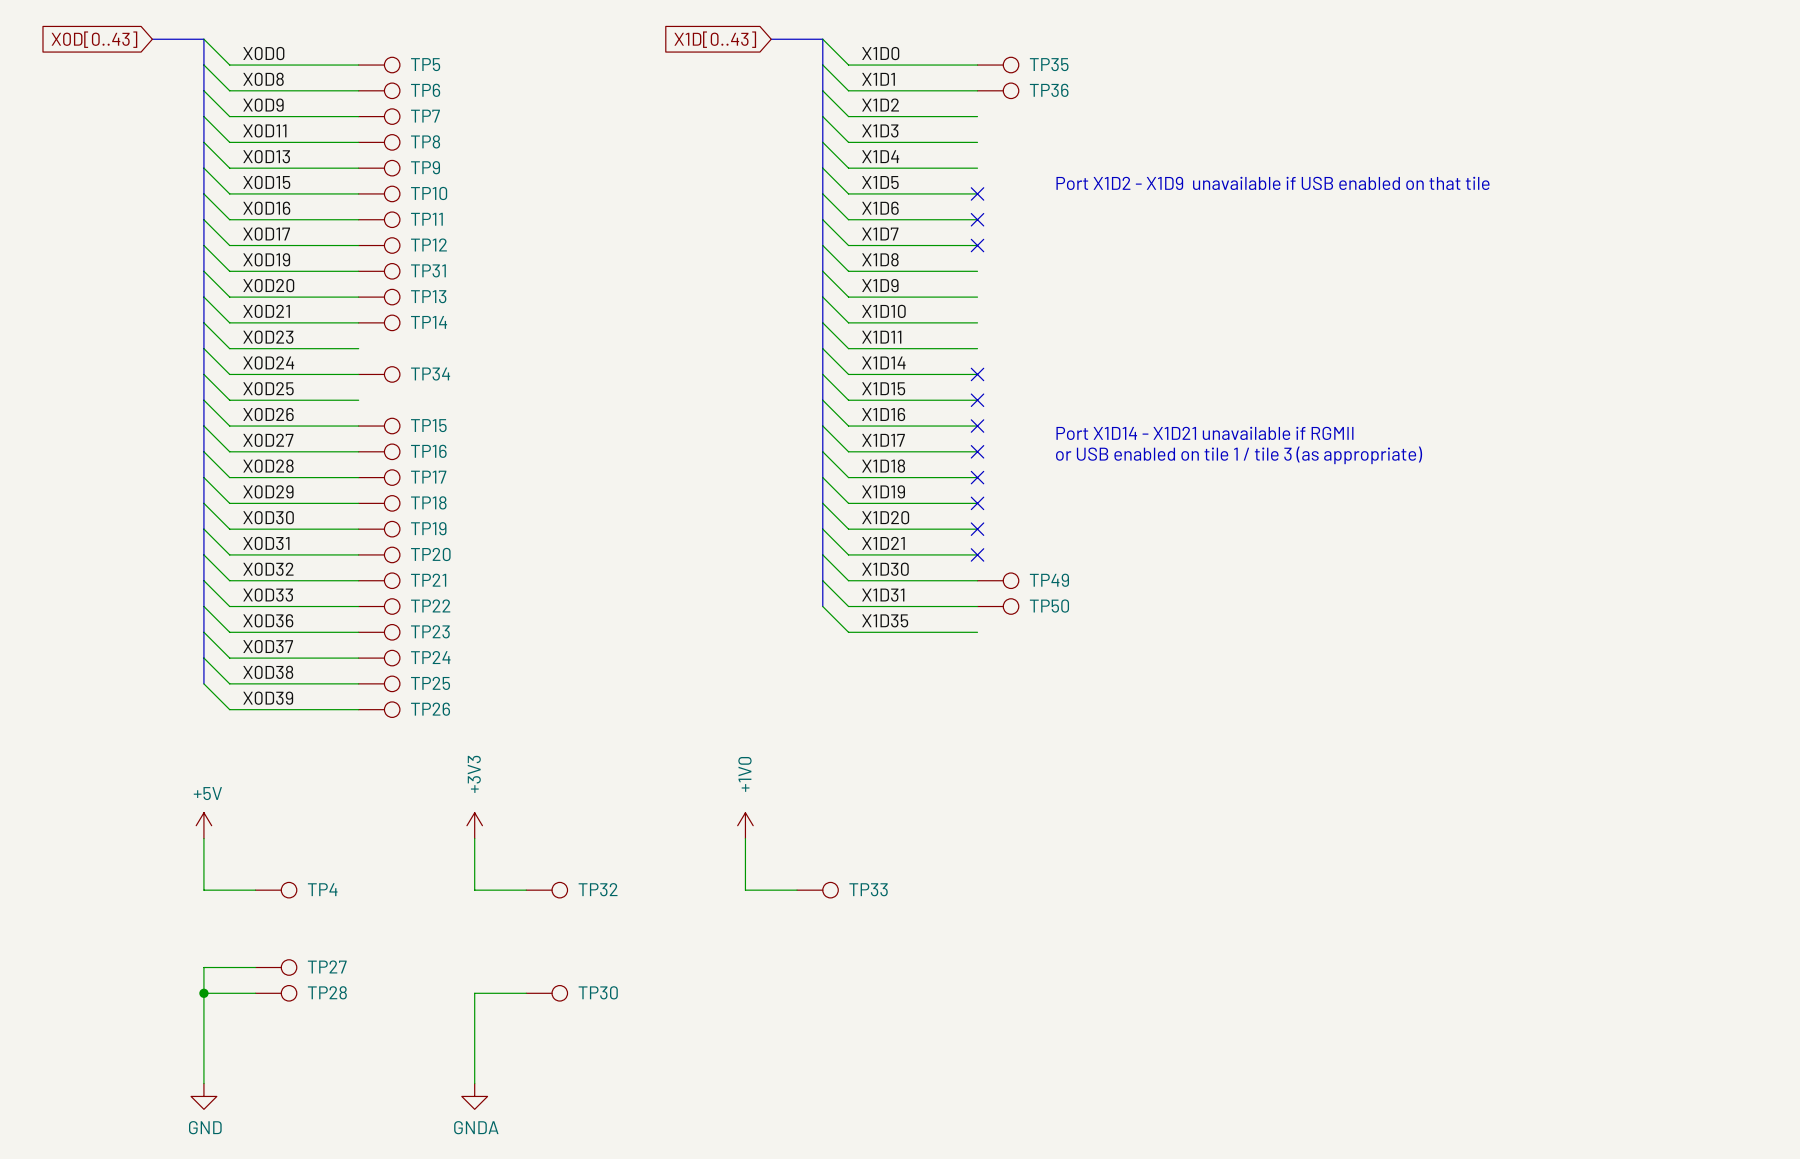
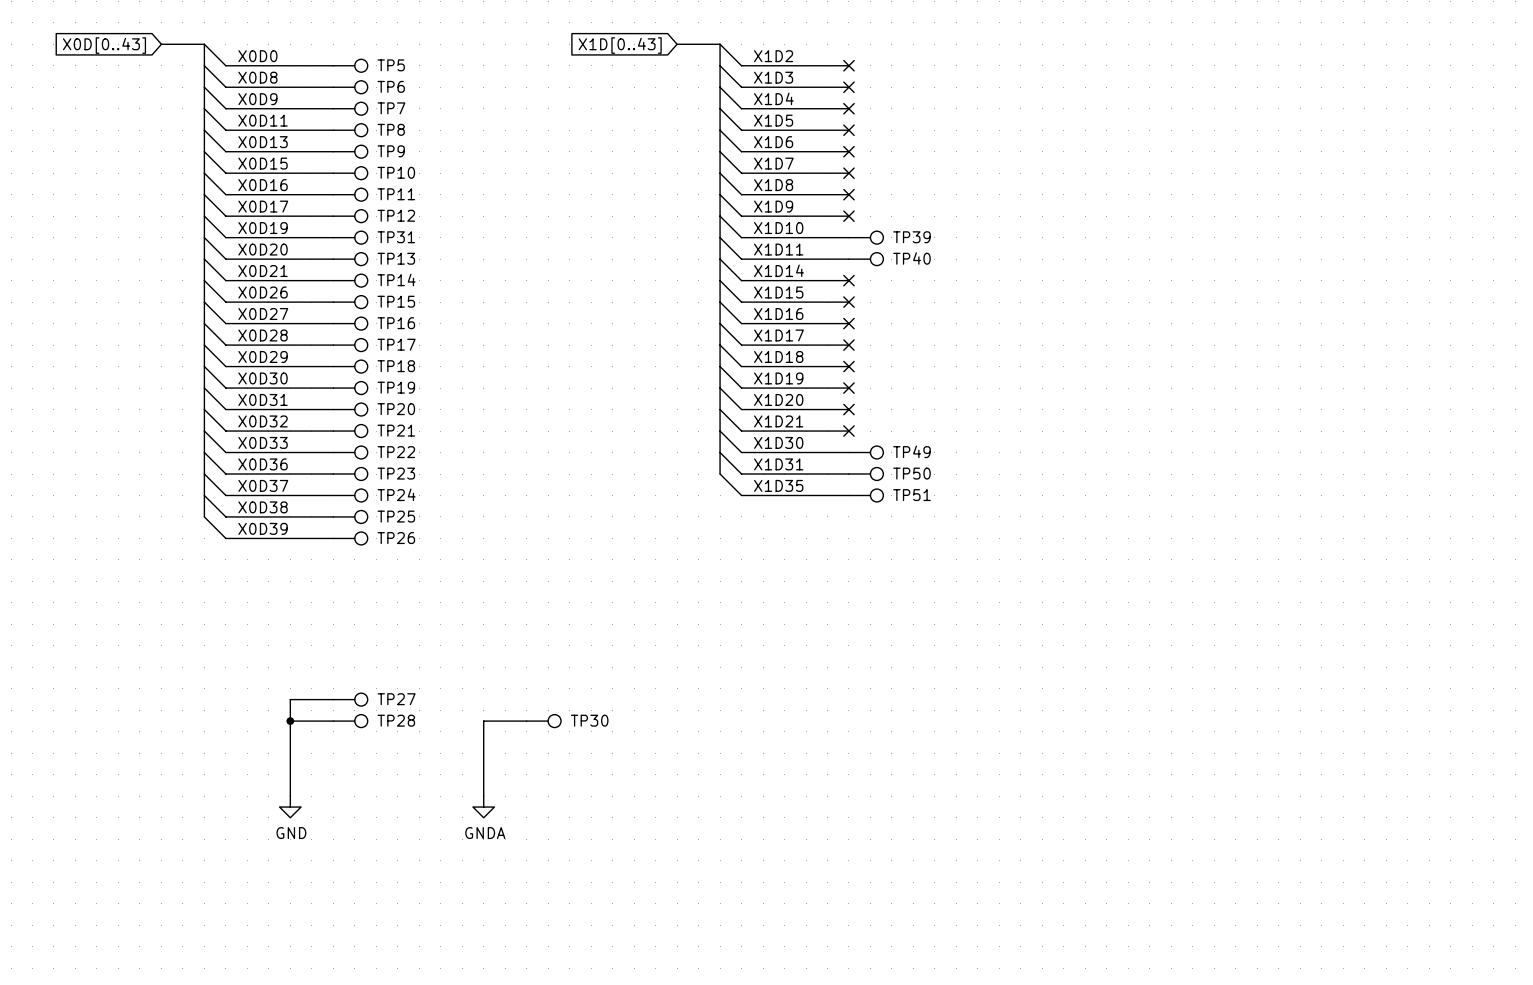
label: X1D0 (880, 53) -> X1D2 (773, 56)
no-connect mark: none -> (848, 65)
TP35: (998, 65) -> none
label: X1D1 (878, 79) -> X1D3 (773, 77)
no-connect mark: none -> (848, 87)
TP36: (998, 90) -> none
label: X1D2 (880, 105) -> X1D4 (773, 98)
no-connect mark: none -> (848, 108)
label: X1D3 (880, 130) -> X1D5 (773, 120)
no-connect mark: none -> (848, 130)
label: X1D4 (880, 156) -> X1D6 (773, 142)
no-connect mark: none -> (848, 151)
label: X1D5 (880, 182) -> X1D7 (773, 163)
text: Port X1D2 - X1D9 unavailable if USB enabled on that tile (1272, 183) -> none
label: X1D6 (880, 208) -> X1D8 (773, 185)
label: X1D7 (880, 234) -> X1D9 (773, 206)
label: X1D8 (880, 259) -> X1D10 (778, 228)
TP39: none -> (866, 237)
label: X1D9 (880, 285) -> X1D11 (778, 249)
TP40: none -> (866, 259)
label: X1D10 (883, 311) -> X1D14 (778, 270)
no-connect mark: none -> (848, 280)
label: X0D23 (268, 337) -> X0D26 (263, 292)
label: X1D11 (881, 337) -> X1D15 (778, 292)
TP15: none -> (350, 302)
no-connect mark: none -> (848, 302)
label: X0D24 (268, 362) -> X0D27 (263, 314)
label: X1D14 (883, 362) -> X1D16 (778, 314)
TP34 name: TP34 (430, 374) -> TP16 (396, 323)
label: X0D25 (268, 388) -> X0D28 (263, 335)
label: X1D15 (883, 388) -> X1D17 (778, 335)
TP17: none -> (350, 345)
label: X0D26 (268, 414) -> X0D29 (263, 356)
label: X1D16 (883, 414) -> X1D18 (778, 356)
TP15 name: TP15 (428, 425) -> TP18 (396, 366)
text: Port X1D14 - X1D21 unavailable if RGMII (1204, 433) -> none
label: X0D27 (268, 440) -> X0D30 (263, 378)
label: X1D17 (883, 440) -> X1D19 (778, 378)
TP16 name: TP16 (428, 451) -> TP19 (396, 387)
text: or USB enabled on tile 1 / tile 3 (as appropriate) (1239, 455) -> none
label: X0D28 (268, 466) -> X0D31 (263, 399)
label: X1D18 (883, 466) -> X1D20 (778, 399)
TP17 name: TP17 (428, 477) -> TP20 (396, 409)
label: X0D29 (268, 491) -> X0D32 (263, 421)
label: X1D19 (883, 491) -> X1D21 (778, 421)
TP18 name: TP18 (428, 502) -> TP21 (396, 430)
label: X0D30 (268, 517) -> X0D33 (263, 442)
label: X1D20 (885, 517) -> X1D30 (778, 442)
TP19 name: TP19 (428, 528) -> TP22 (396, 452)
no-connect mark: (977, 529) -> none
TP49: none -> (866, 452)
label: X0D31 (266, 543) -> X0D36 (263, 464)
label: X1D21 (883, 543) -> X1D31 (778, 464)
TP20 name: TP20 (430, 554) -> TP23 (396, 473)
bus: (822, 554) (822, 606) -> none
no-connect mark: (977, 554) -> none
label: X0D32 (268, 569) -> X0D37 (263, 485)
label: X1D30 (885, 569) -> X1D35 (778, 485)
TP21 name: TP21 (428, 580) -> TP24 (396, 494)
wire: (822, 580) (848, 606) (977, 606) -> none
TP49 name: TP49 (1049, 580) -> TP51 (911, 495)
label: X0D33 (268, 595) -> X0D38 (263, 507)
label: X1D31 (883, 595) -> none
TP22 name: TP22 (430, 605) -> TP25 (396, 516)
bus: (203, 606) (203, 683) -> none
wire: (822, 606) (848, 632) (977, 632) -> none
TP50 position: (998, 606) -> (866, 474)
label: X0D36 (268, 620) -> X0D39 (263, 528)
label: X1D35 (885, 620) -> none
TP23 name: TP23 (430, 631) -> TP26 (396, 538)
wire: (203, 632) (229, 658) (358, 658) -> none
label: X0D37 (268, 646) -> none
wire: (203, 658) (229, 683) (358, 683) -> none
TP24: (379, 658) -> none
label: X0D38 (268, 672) -> none
wire: (203, 683) (229, 709) (358, 709) -> none
TP25: (379, 683) -> none
label: X0D39 (268, 698) -> none
TP26: (379, 709) -> none
power symbol: +5V (203, 825) -> none
power symbol: +3V3 (474, 825) -> none
power symbol: +1V0 (745, 825) -> none
wire: (203, 838) (203, 890) (255, 890) -> none
wire: (474, 838) (474, 890) (526, 890) -> none
wire: (745, 838) (745, 890) (797, 890) -> none
junction: none -> (290, 721)
TP4: (276, 890) -> none
TP32: (546, 890) -> none
TP33: (817, 890) -> none
wire: (255, 967) (203, 967) (203, 1083) -> (333, 699) (290, 699) (290, 796)
TP27 position: (276, 967) -> (350, 699)
wire: (203, 993) (255, 993) -> (290, 721) (333, 721)
junction: (203, 993) -> none
TP28 position: (276, 993) -> (350, 721)
wire: (526, 993) (474, 993) (474, 1083) -> (526, 721) (483, 721) (483, 796)
TP30 position: (546, 993) -> (543, 721)
power symbol position: GND (203, 1096) -> GND (290, 807)
power symbol position: GNDA (474, 1096) -> GNDA (483, 807)

